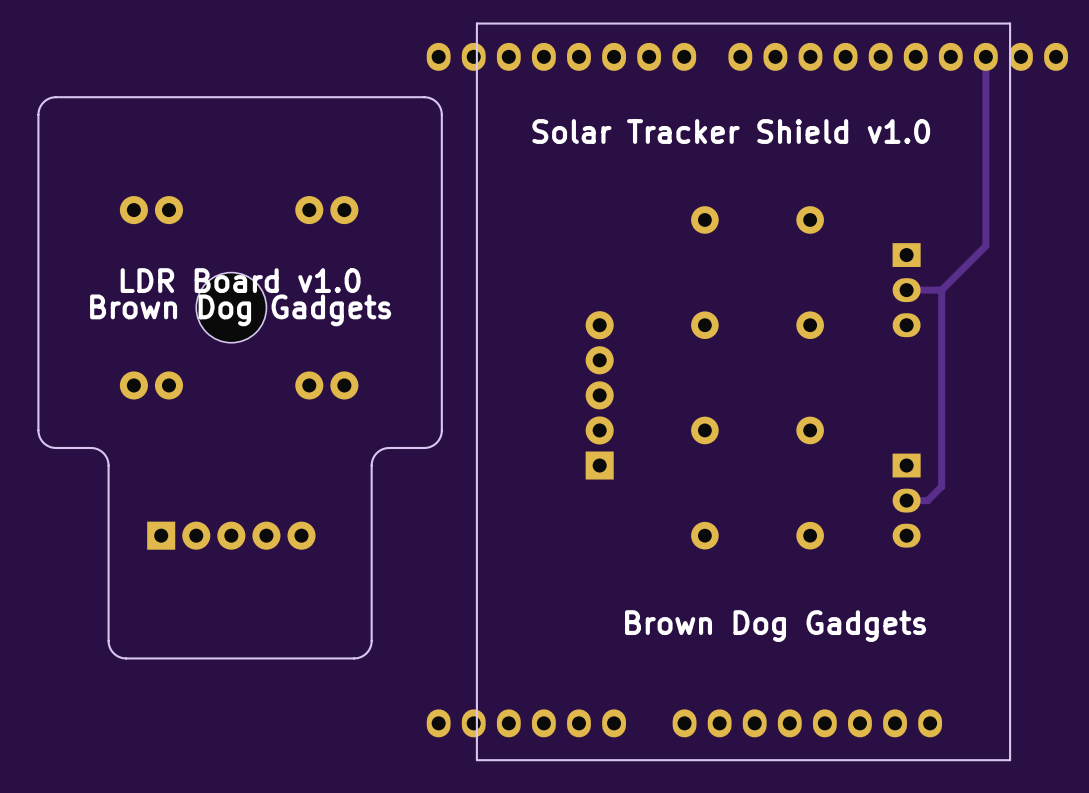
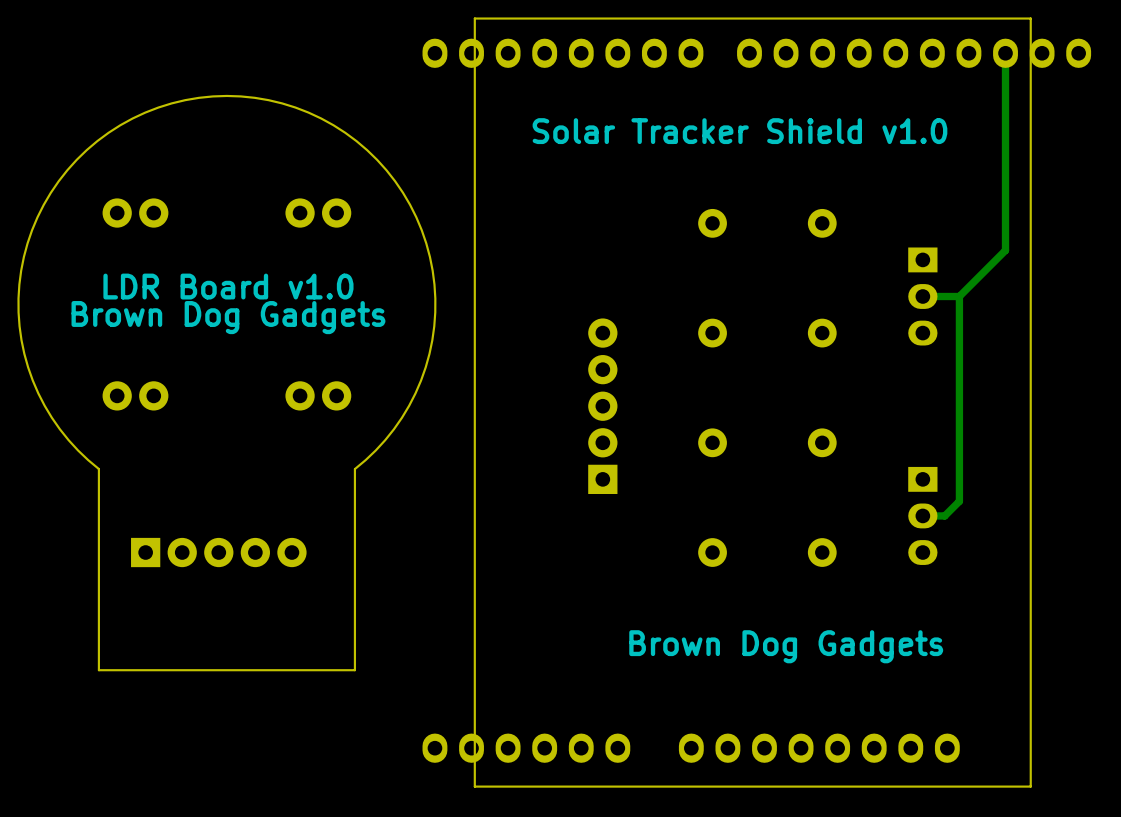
board edge: (424, 97) (55, 97) (47, 99) (40, 105) (38, 114) (38, 432) (42, 441) (49, 446) (95, 448) (101, 451) (107, 458) (108, 640) (110, 649) (117, 656) (126, 658) (354, 658) (362, 656) (369, 649) (371, 640) (372, 460) (376, 453) (384, 448) (430, 446) (438, 441) (441, 432) (441, 114) (436, 102) (424, 97) -> (354, 469) (375, 450) (401, 417) (421, 380) (432, 340) (435, 298) (429, 256) (416, 217) (395, 181) (367, 150) (333, 125) (295, 107) (254, 97) (212, 96) (171, 103) (132, 118) (97, 141) (67, 170) (50, 192) (37, 217) (23, 256) (18, 298) (19, 326) (24, 353) (38, 393) (59, 429) (78, 450) (98, 469) (98, 670) (354, 670) (354, 469)
part: (231, 307) -> none

